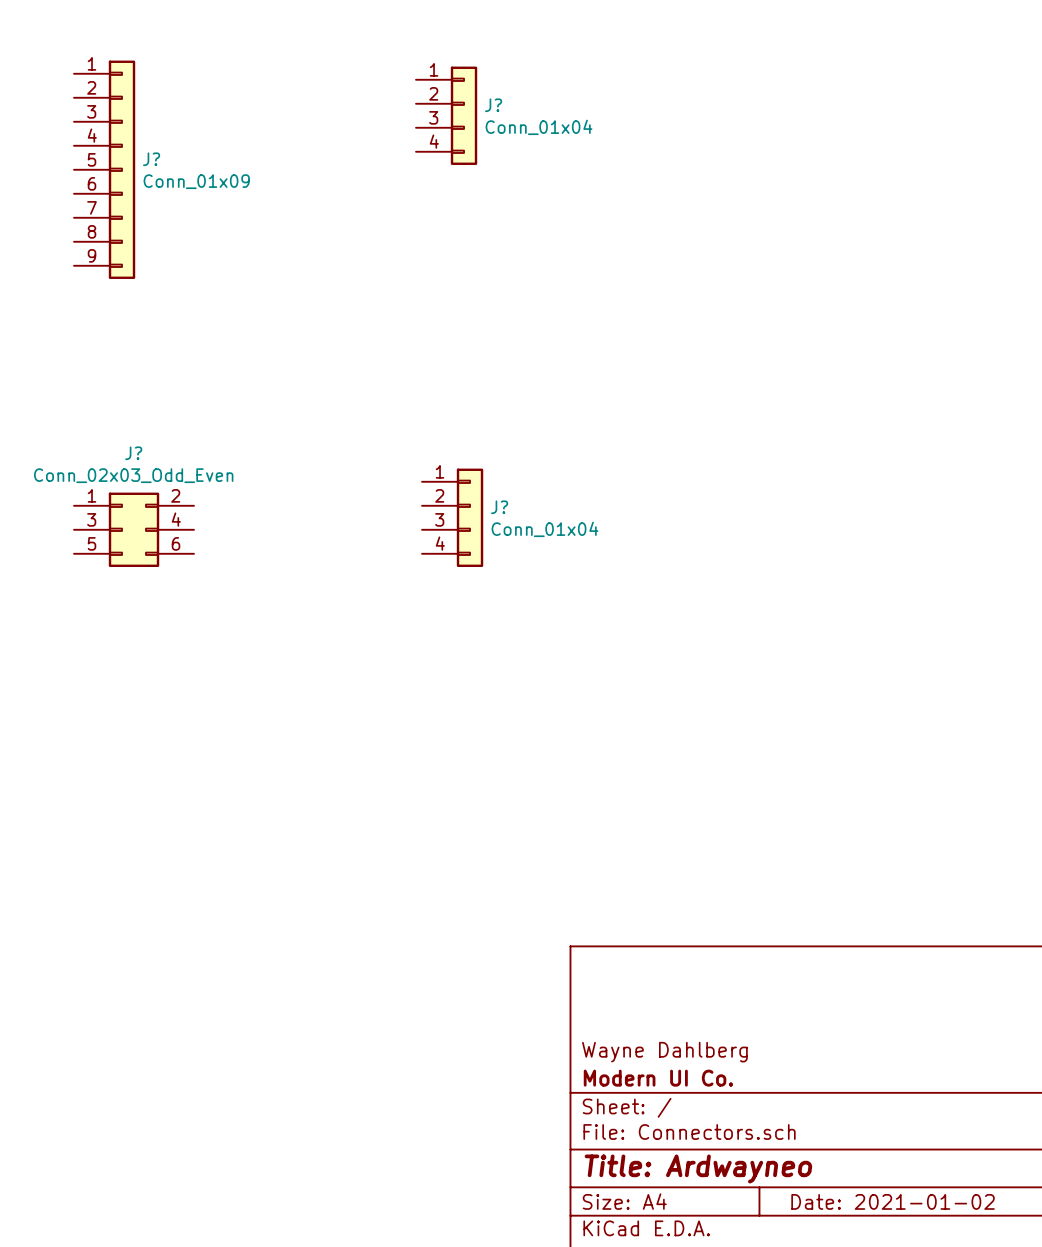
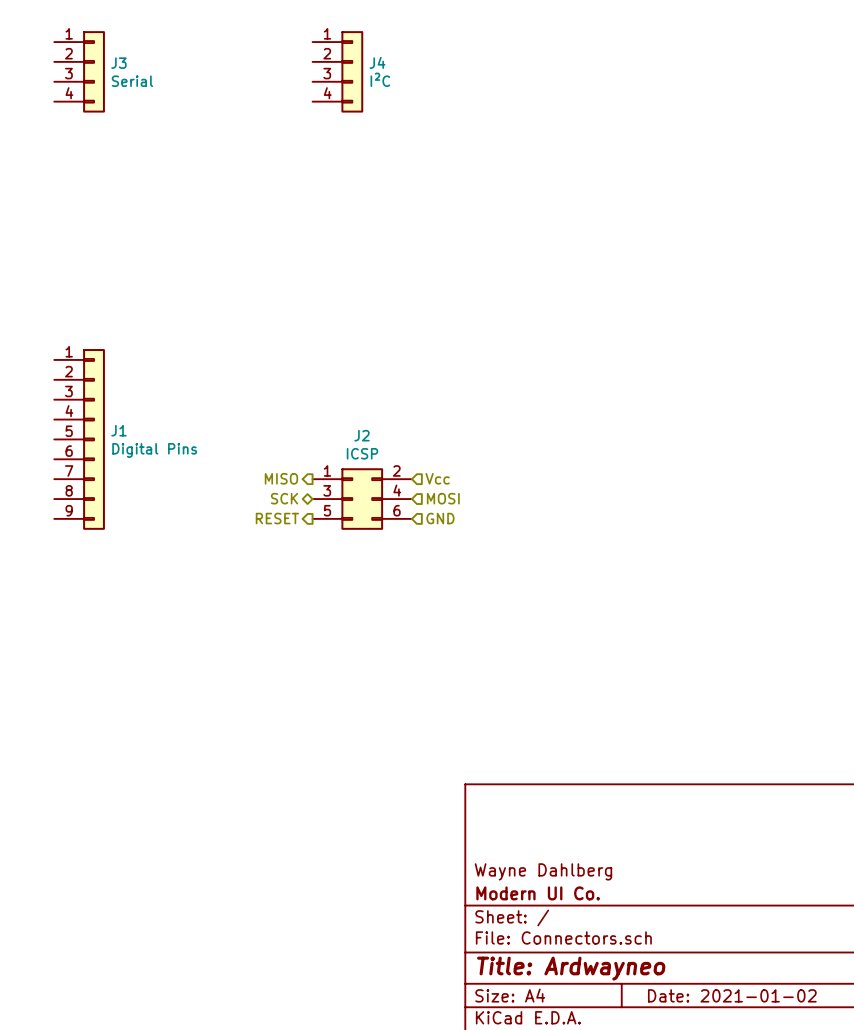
J3: none -> Serial (79, 71)
J4: none -> I²C (337, 71)
J?: Conn_01x04 (446, 115) -> none
J?: Conn_01x09 (104, 169) -> none
J?: Conn_01x04 (452, 517) -> none
J1: none -> Digital Pins (79, 439)
J?: Conn_02x03_Odd_Even (134, 529) -> none
hierarchical label: none -> MISO (281, 478)
hierarchical label: none -> Vcc (437, 478)
hierarchical label: none -> SCK (284, 498)
J2: none -> ICSP (362, 499)
hierarchical label: none -> MOSI (443, 498)
hierarchical label: none -> RESET (277, 518)
hierarchical label: none -> GND (440, 518)

